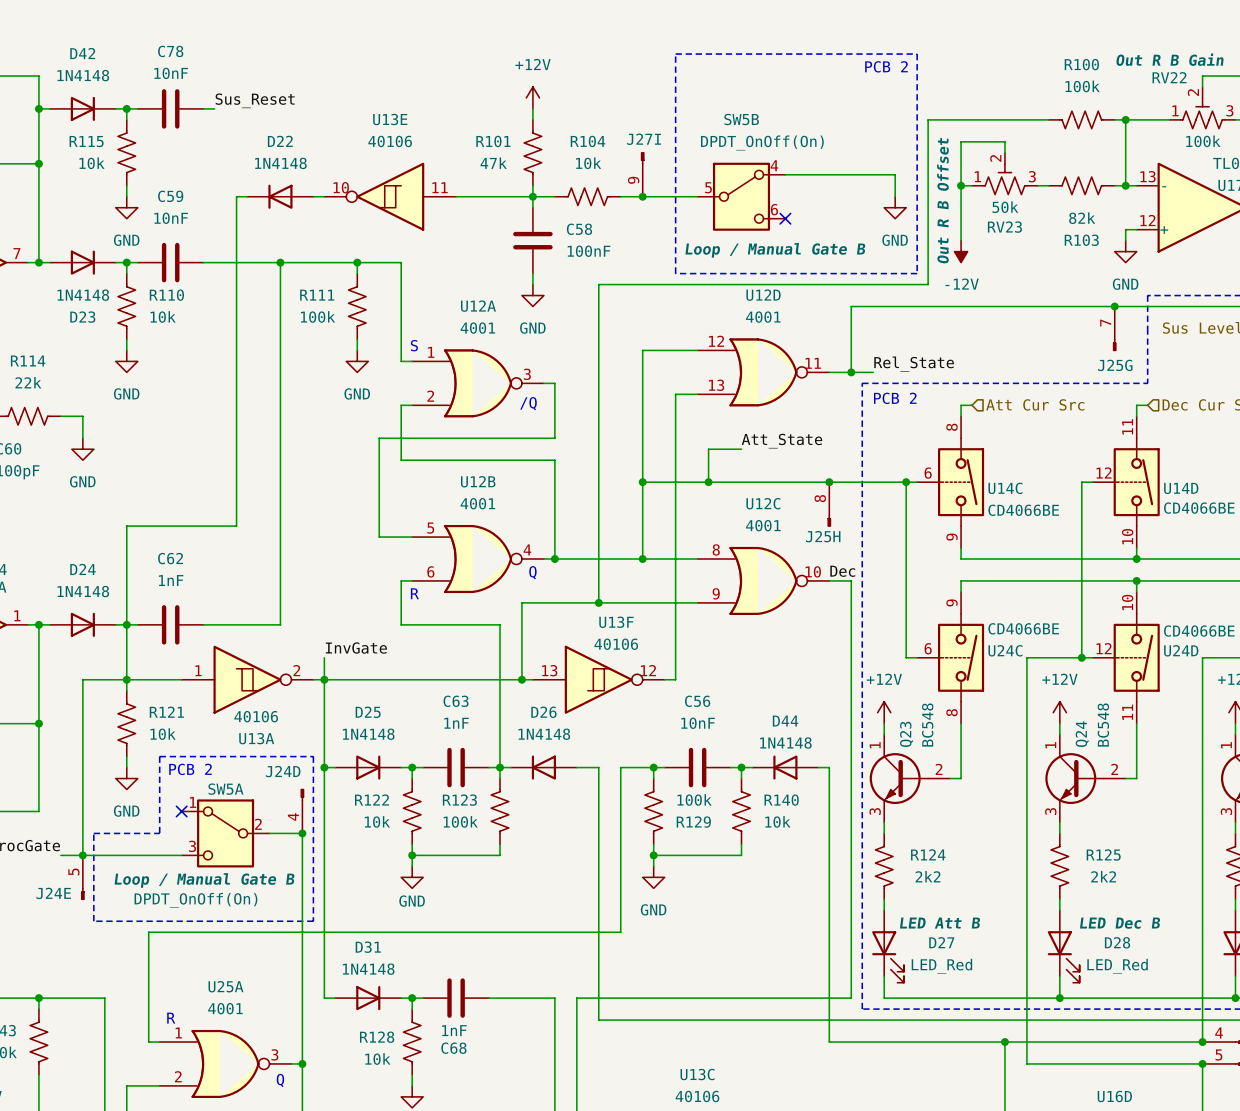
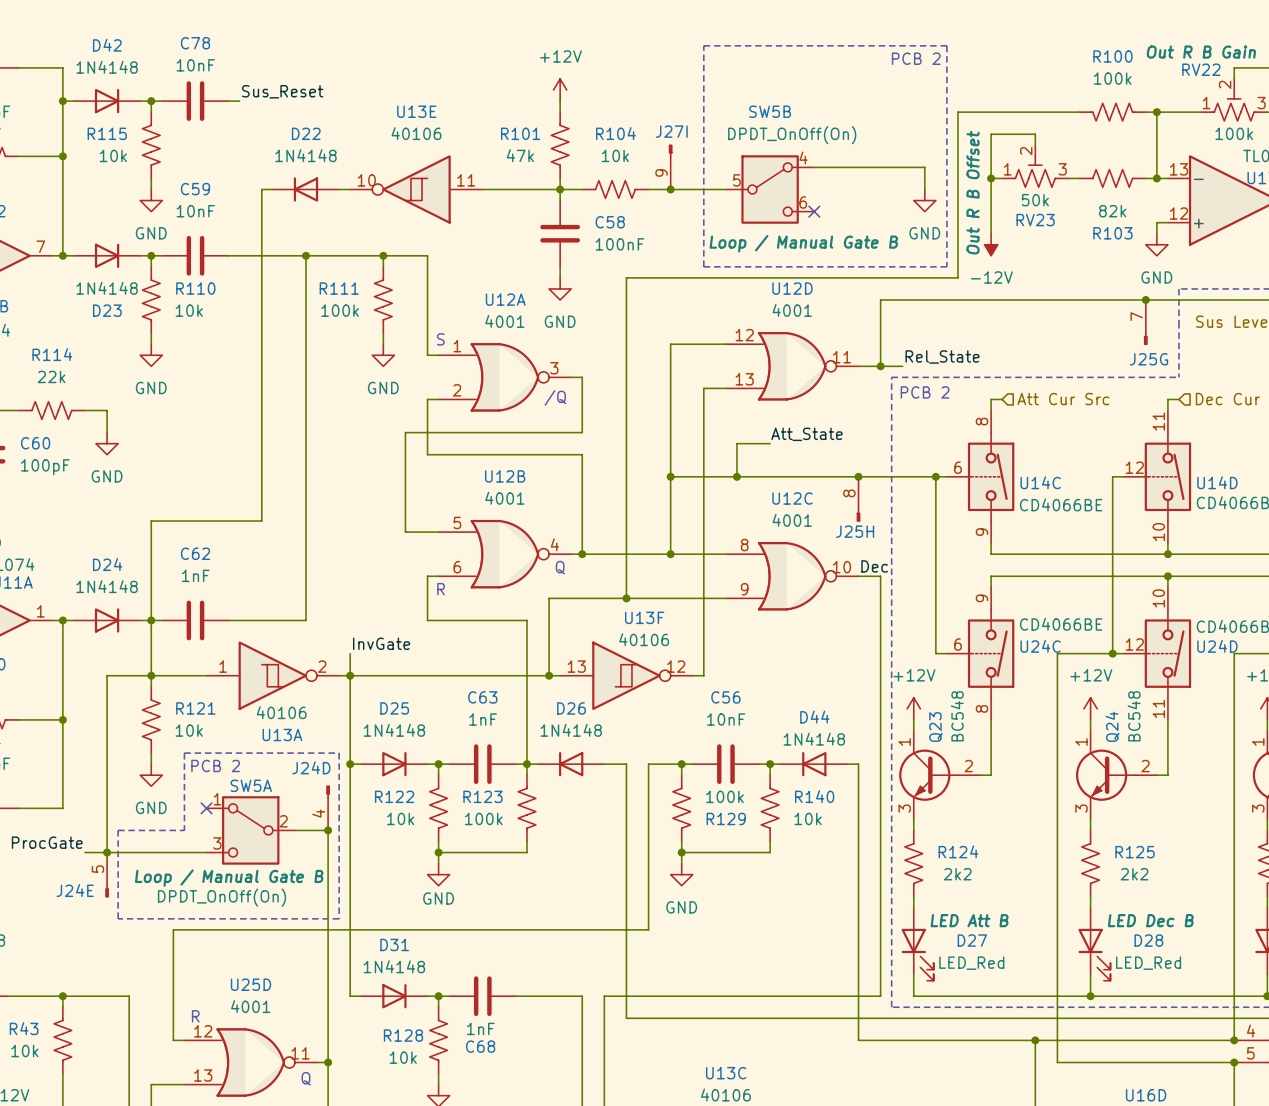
U25A name: U25A (225, 986) -> U25D (250, 984)
U25A pin number: 1 (178, 1032) -> 12 (203, 1031)
U25A pin number: 3 (274, 1054) -> 11 (300, 1053)
U25A pin number: 2 (178, 1076) -> 13 (203, 1075)

